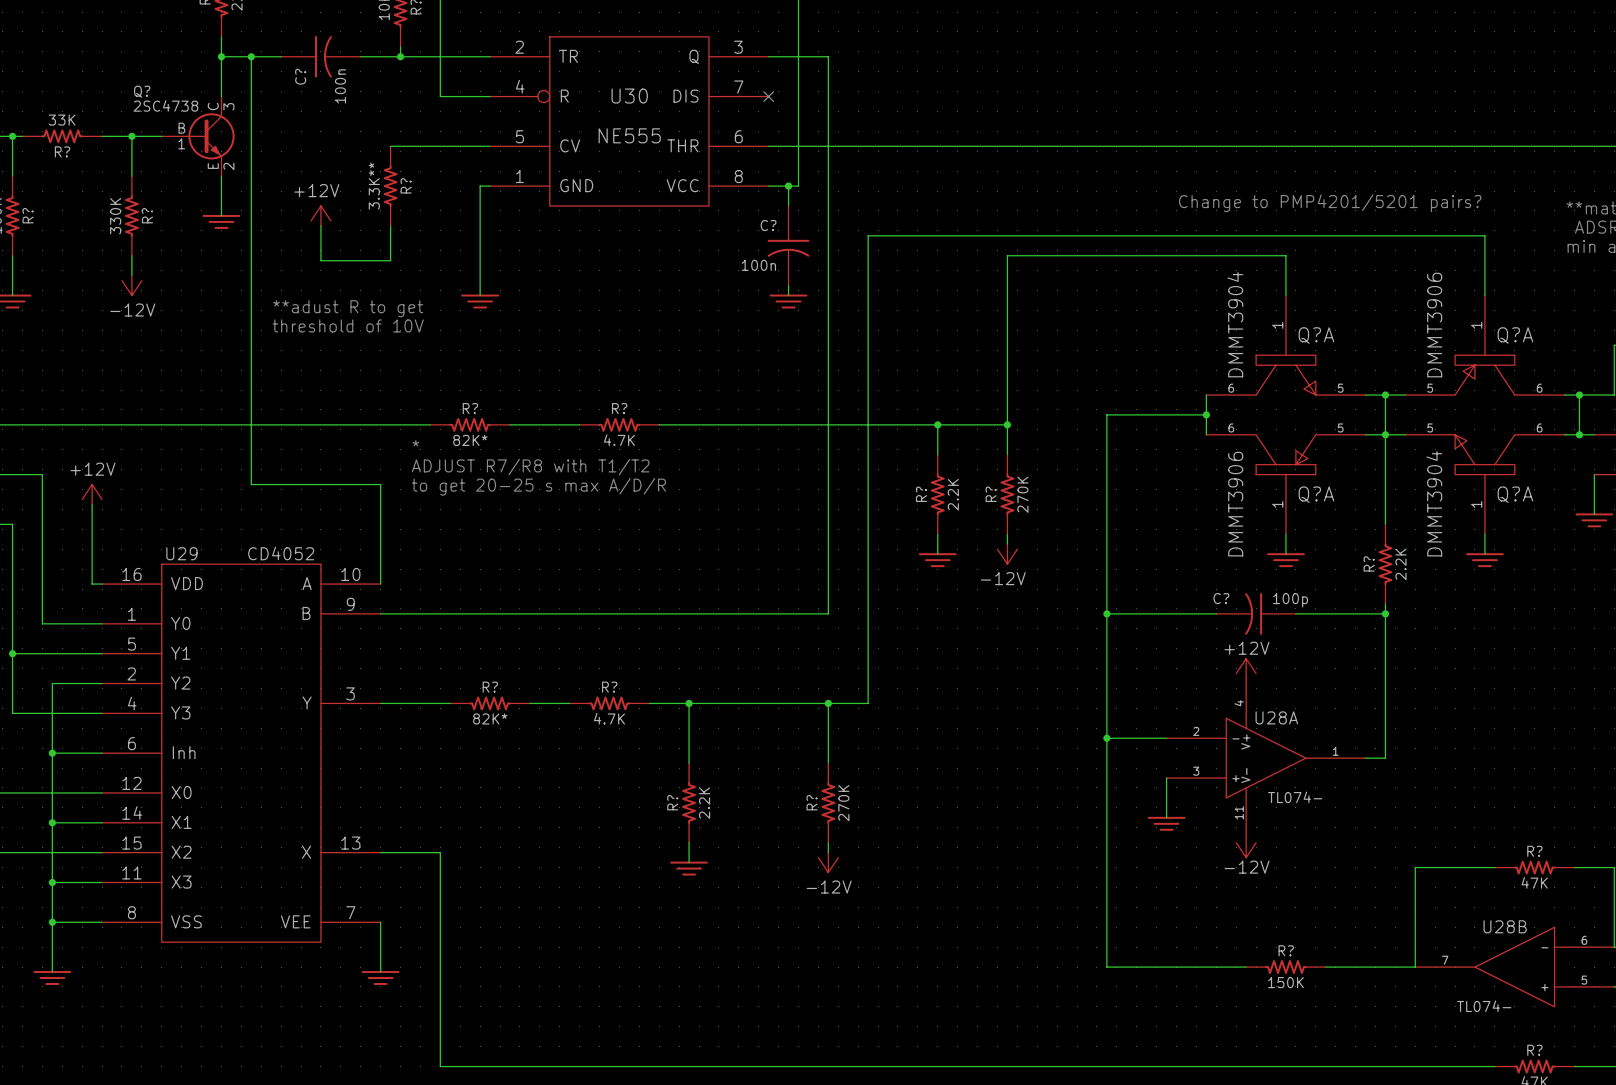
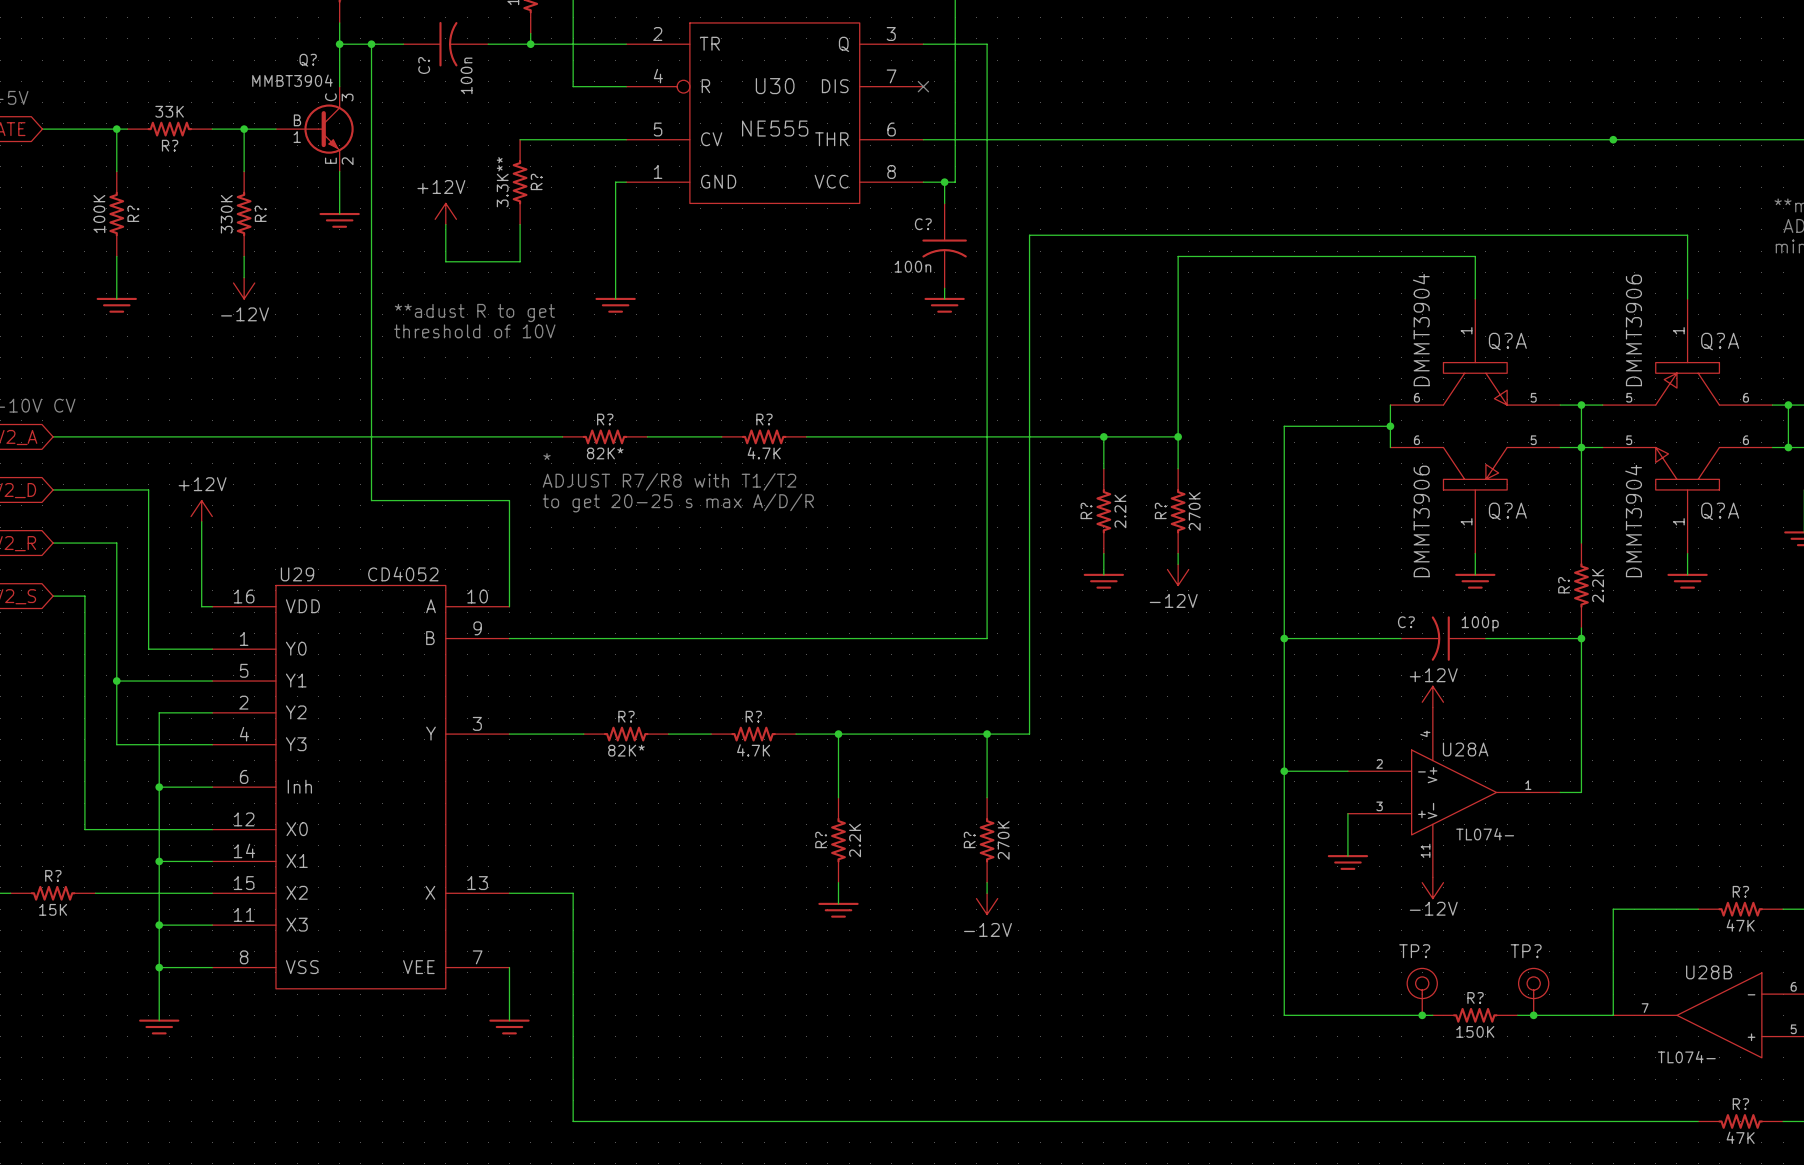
Q? name position: Q? (142, 91) -> Q? (308, 60)
Q? value: 2SC4738 (165, 105) -> MMBT3904 (292, 80)
junction: none -> (1613, 139)
text: Change to PMP4201/5201 pairs? (1330, 203) -> none
TP?: none -> (1422, 991)
TP?: none -> (1533, 991)
junction: none -> (1422, 1015)
junction: none -> (1533, 1015)

